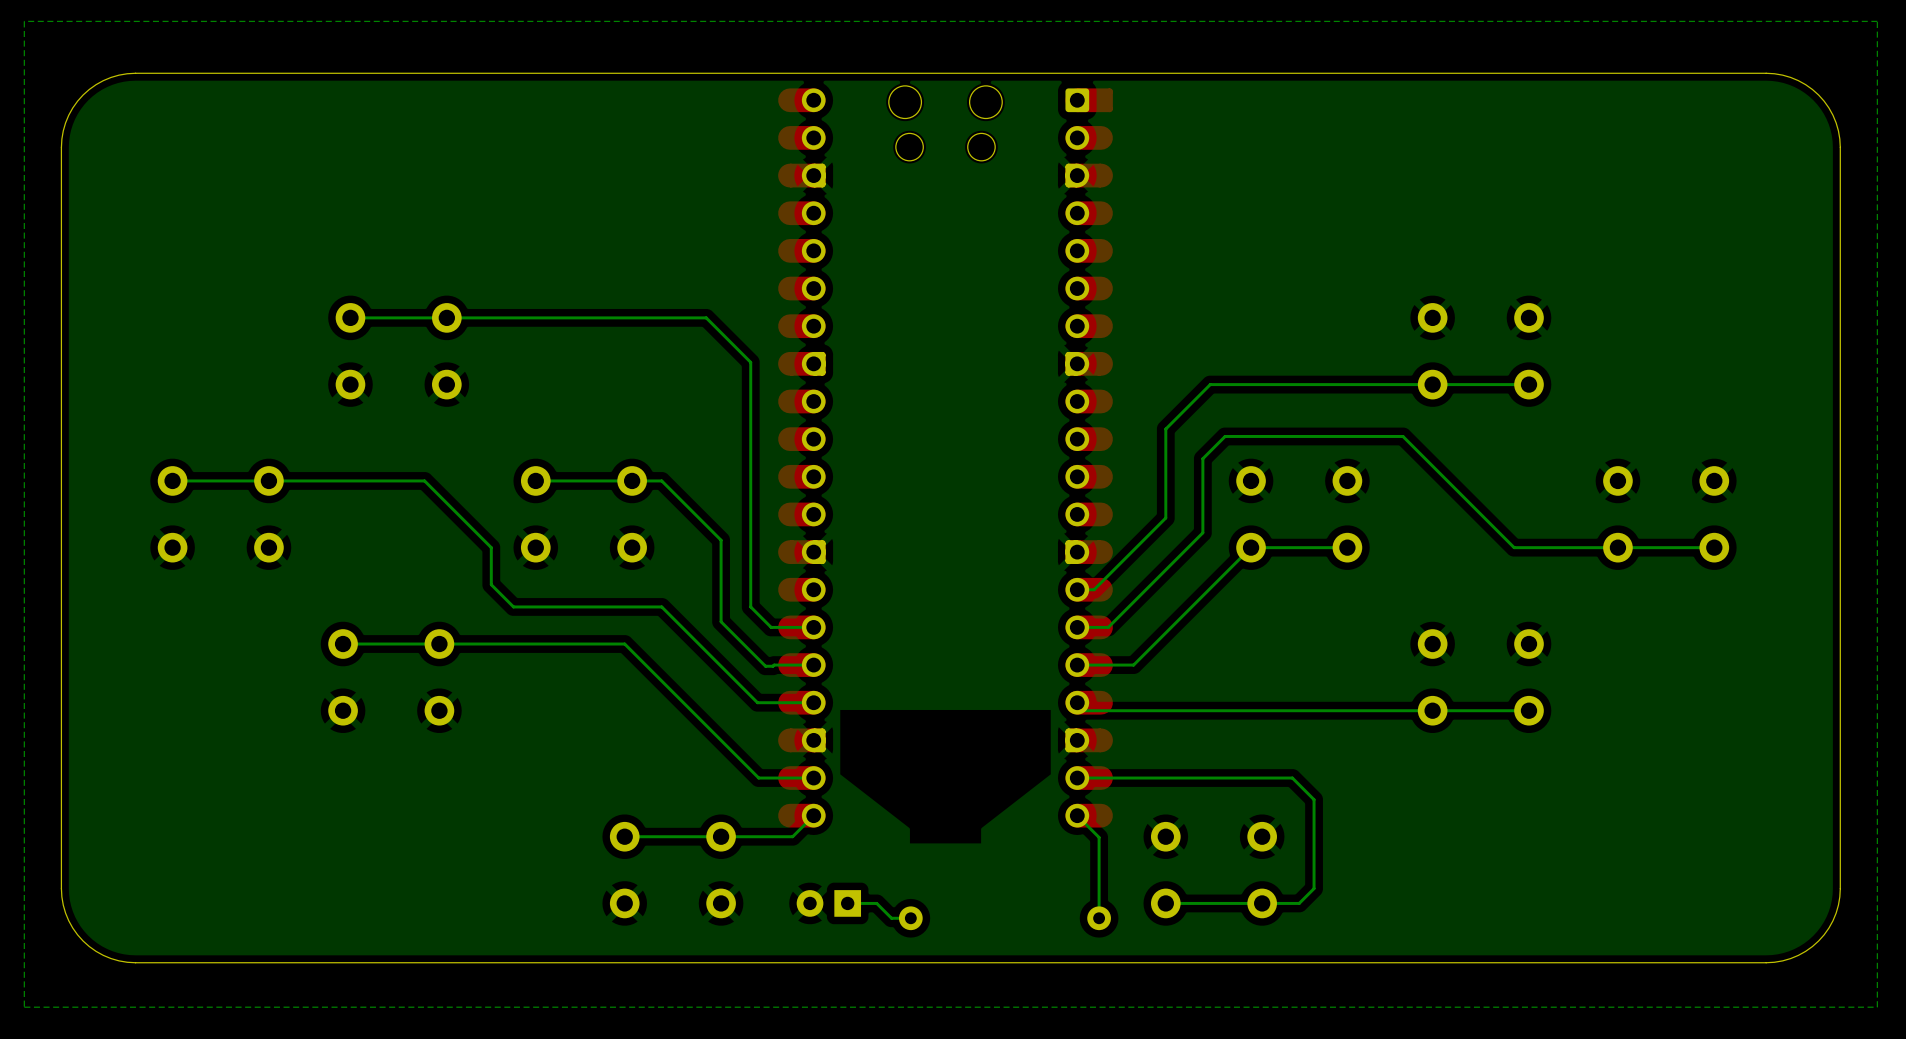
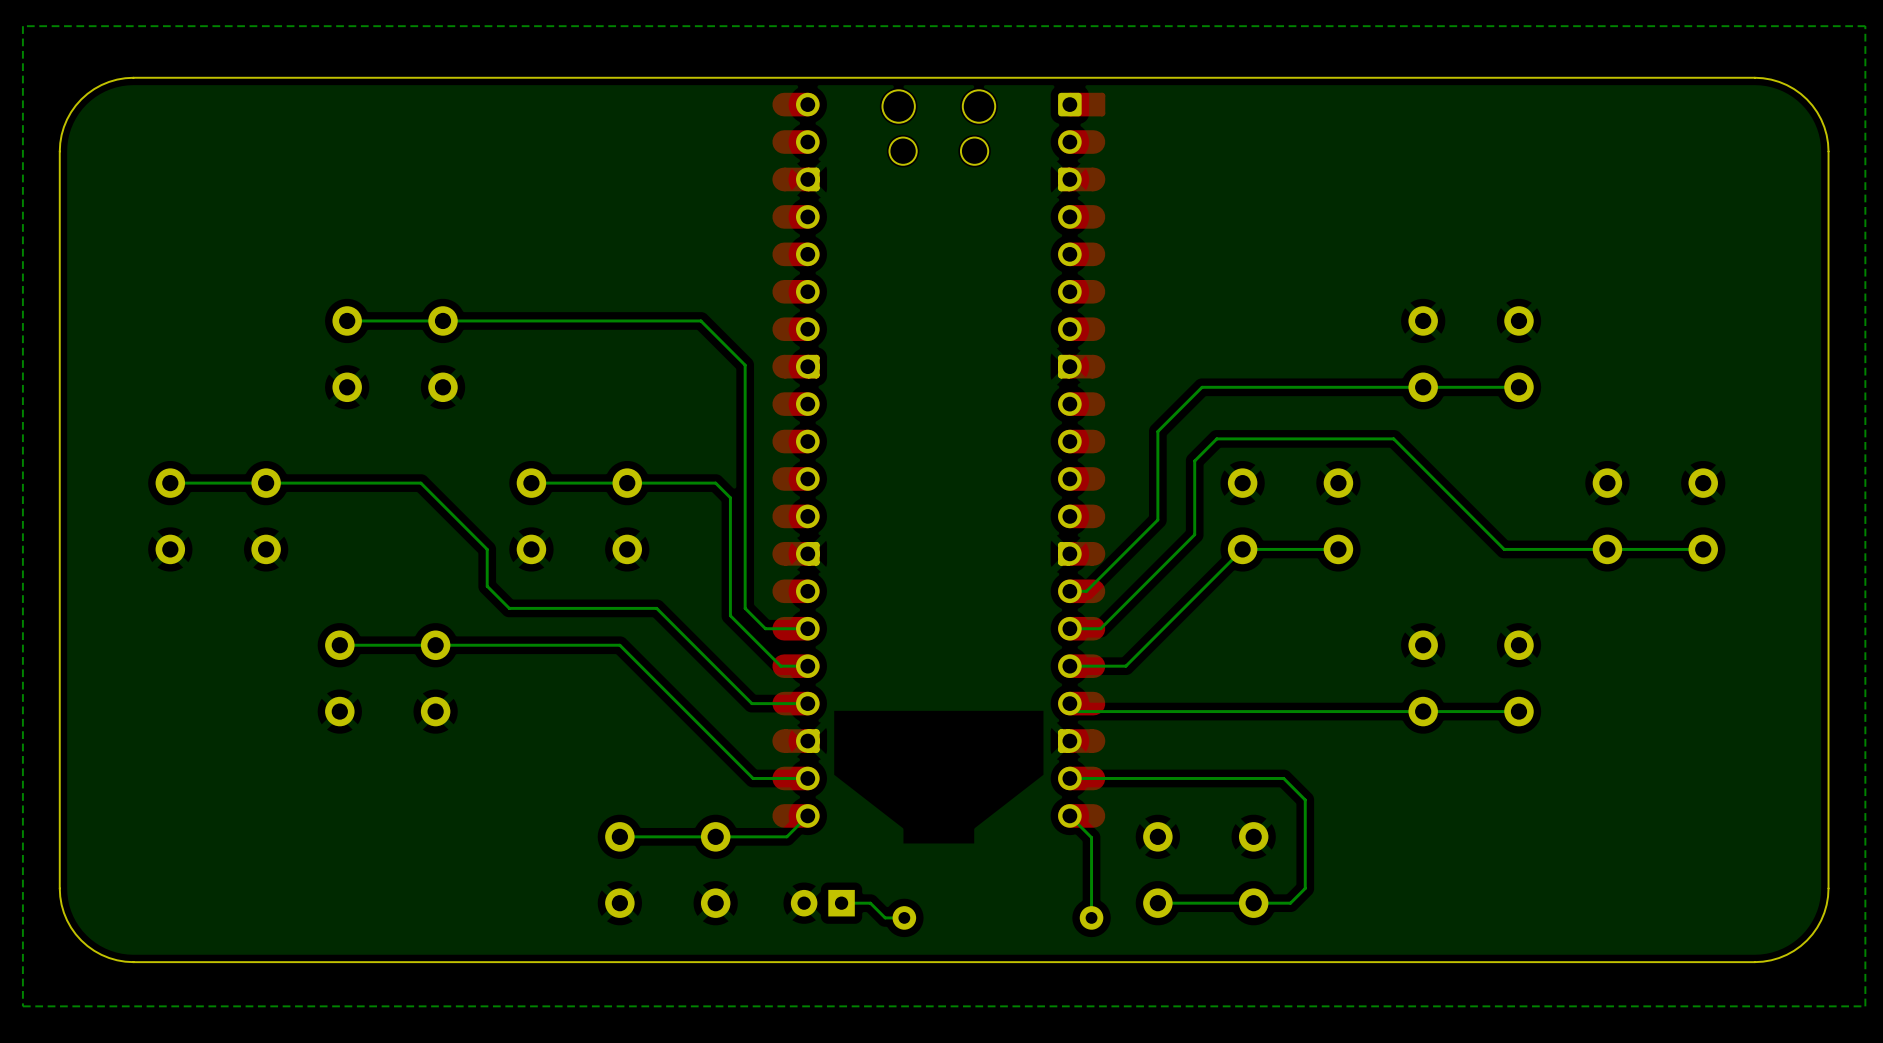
bottom track: (661, 480) (721, 540) (721, 621) (765, 666) (786, 665) -> (656, 483) (715, 483) (730, 497) (730, 615) (780, 666)

